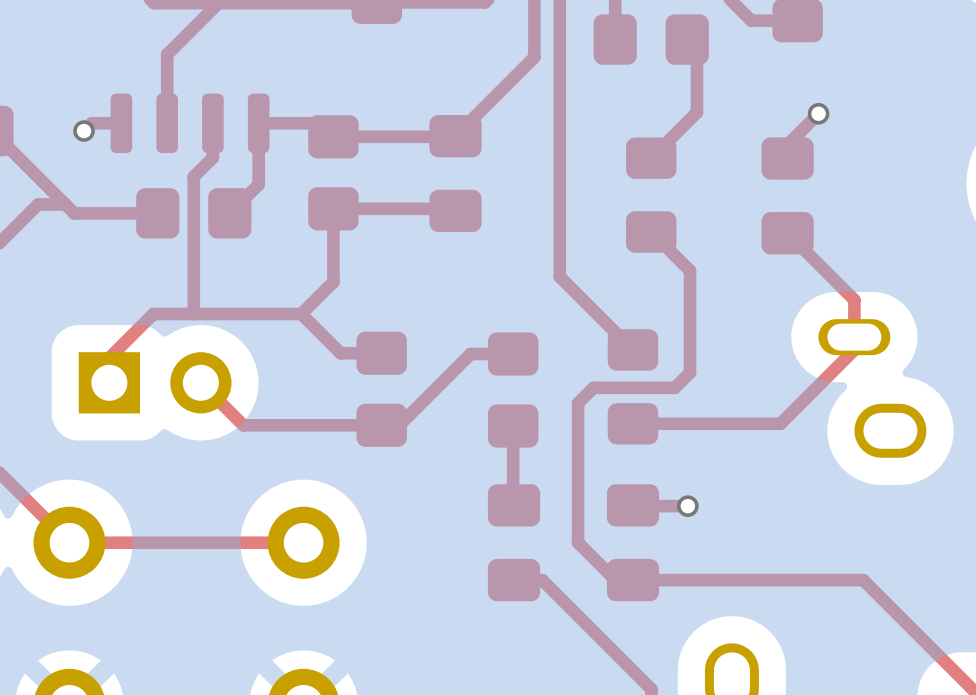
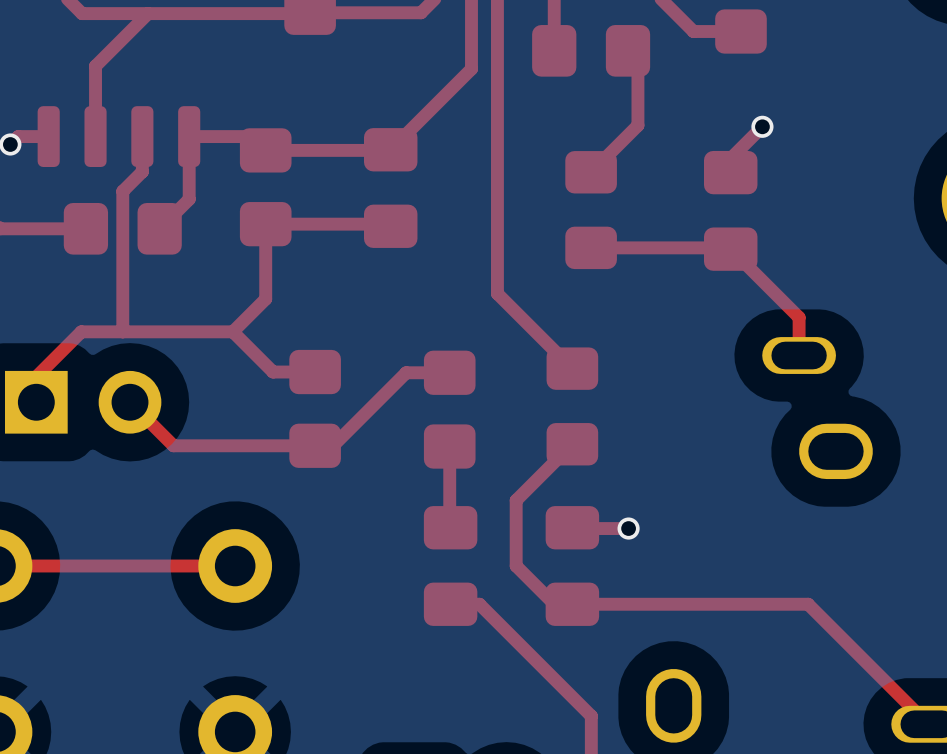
top track: (651, 231) (690, 270) (690, 372) (674, 387) (593, 387) (578, 403) (578, 478) -> (572, 444) (516, 500)
top track: none -> (591, 247) (730, 249)
top track: (854, 337) (854, 349) (780, 423) (632, 423) -> none

